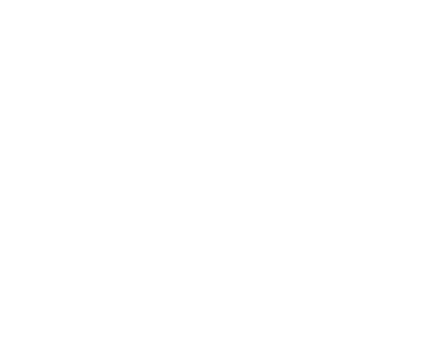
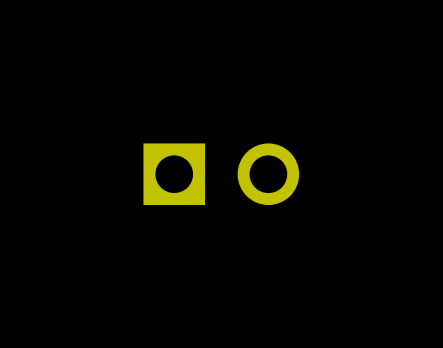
part: none -> (221, 174)

